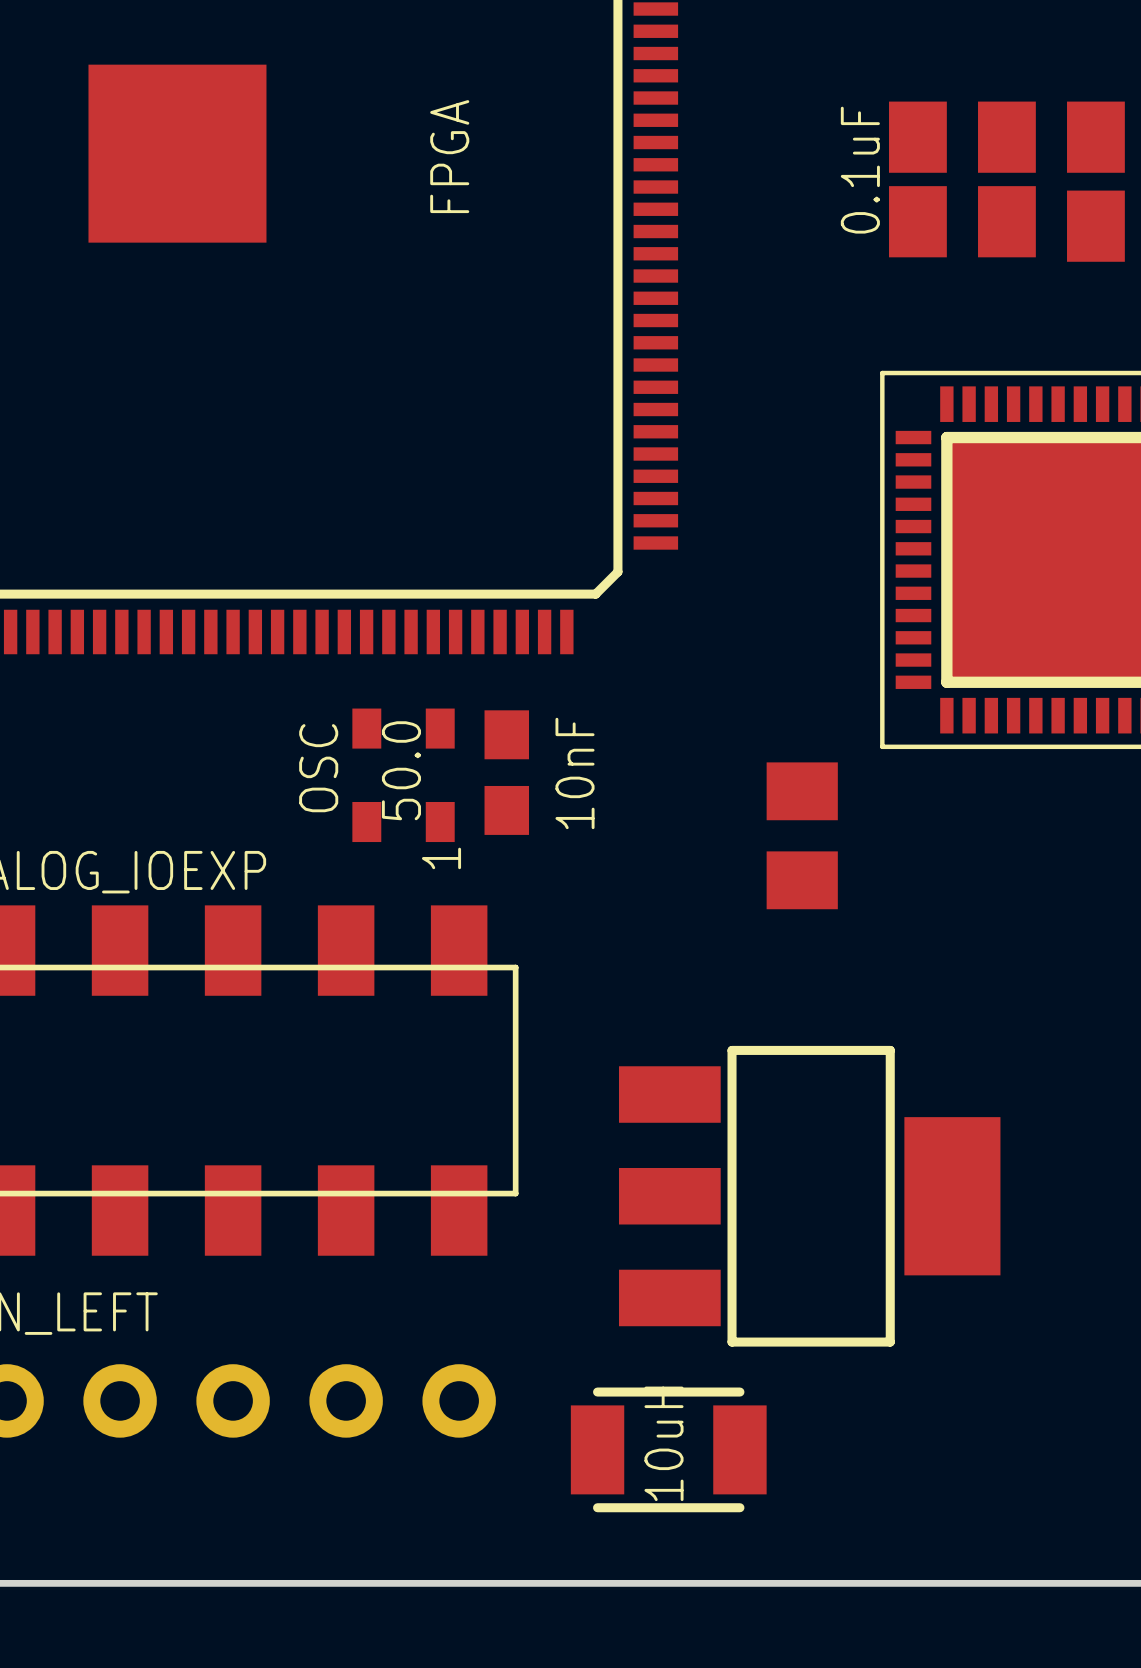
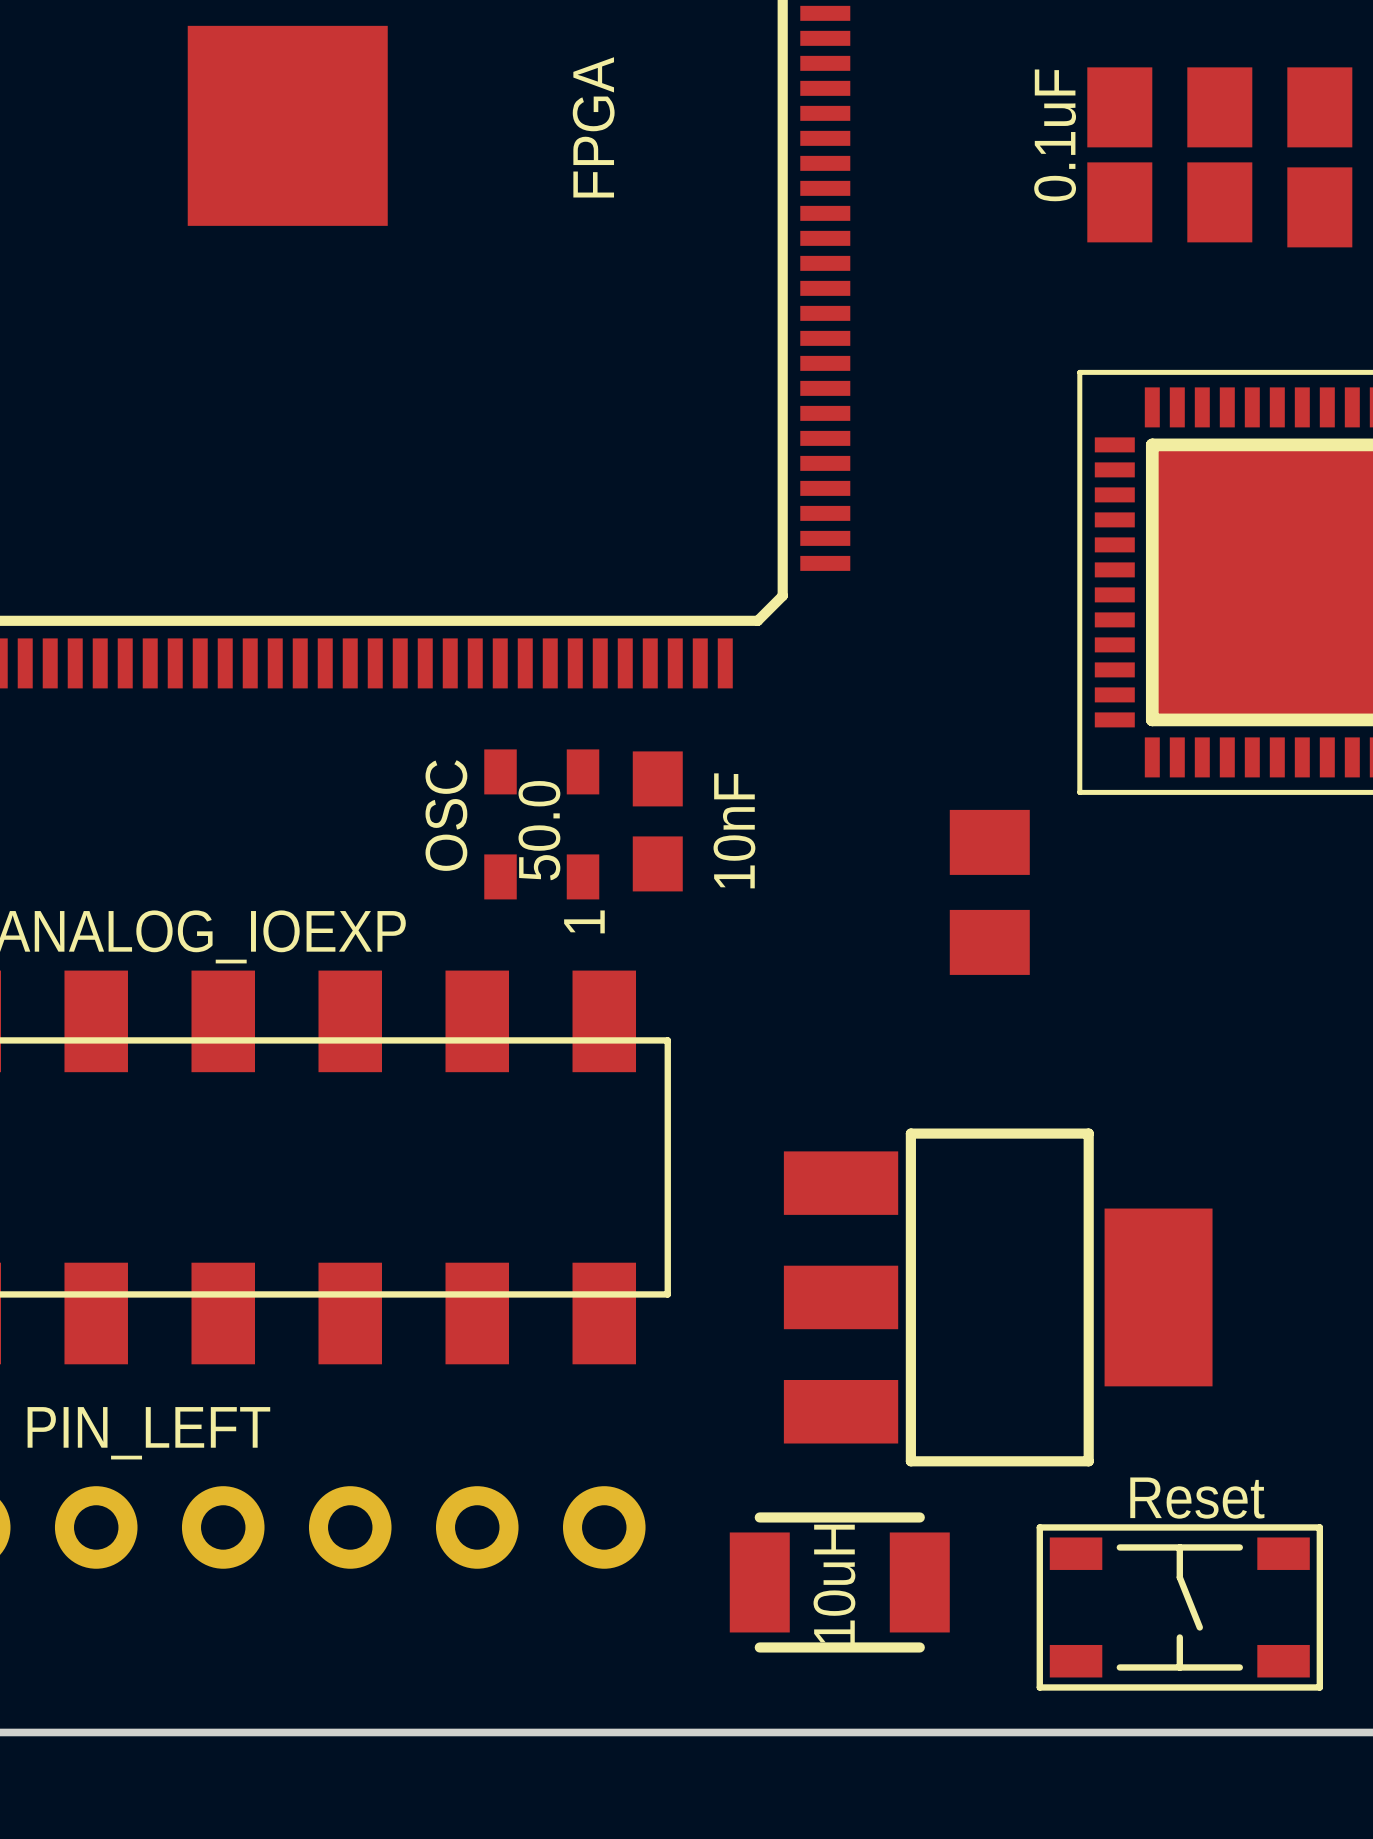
text: none -> Reset (1197, 1498)
part: none -> (1179, 1607)

